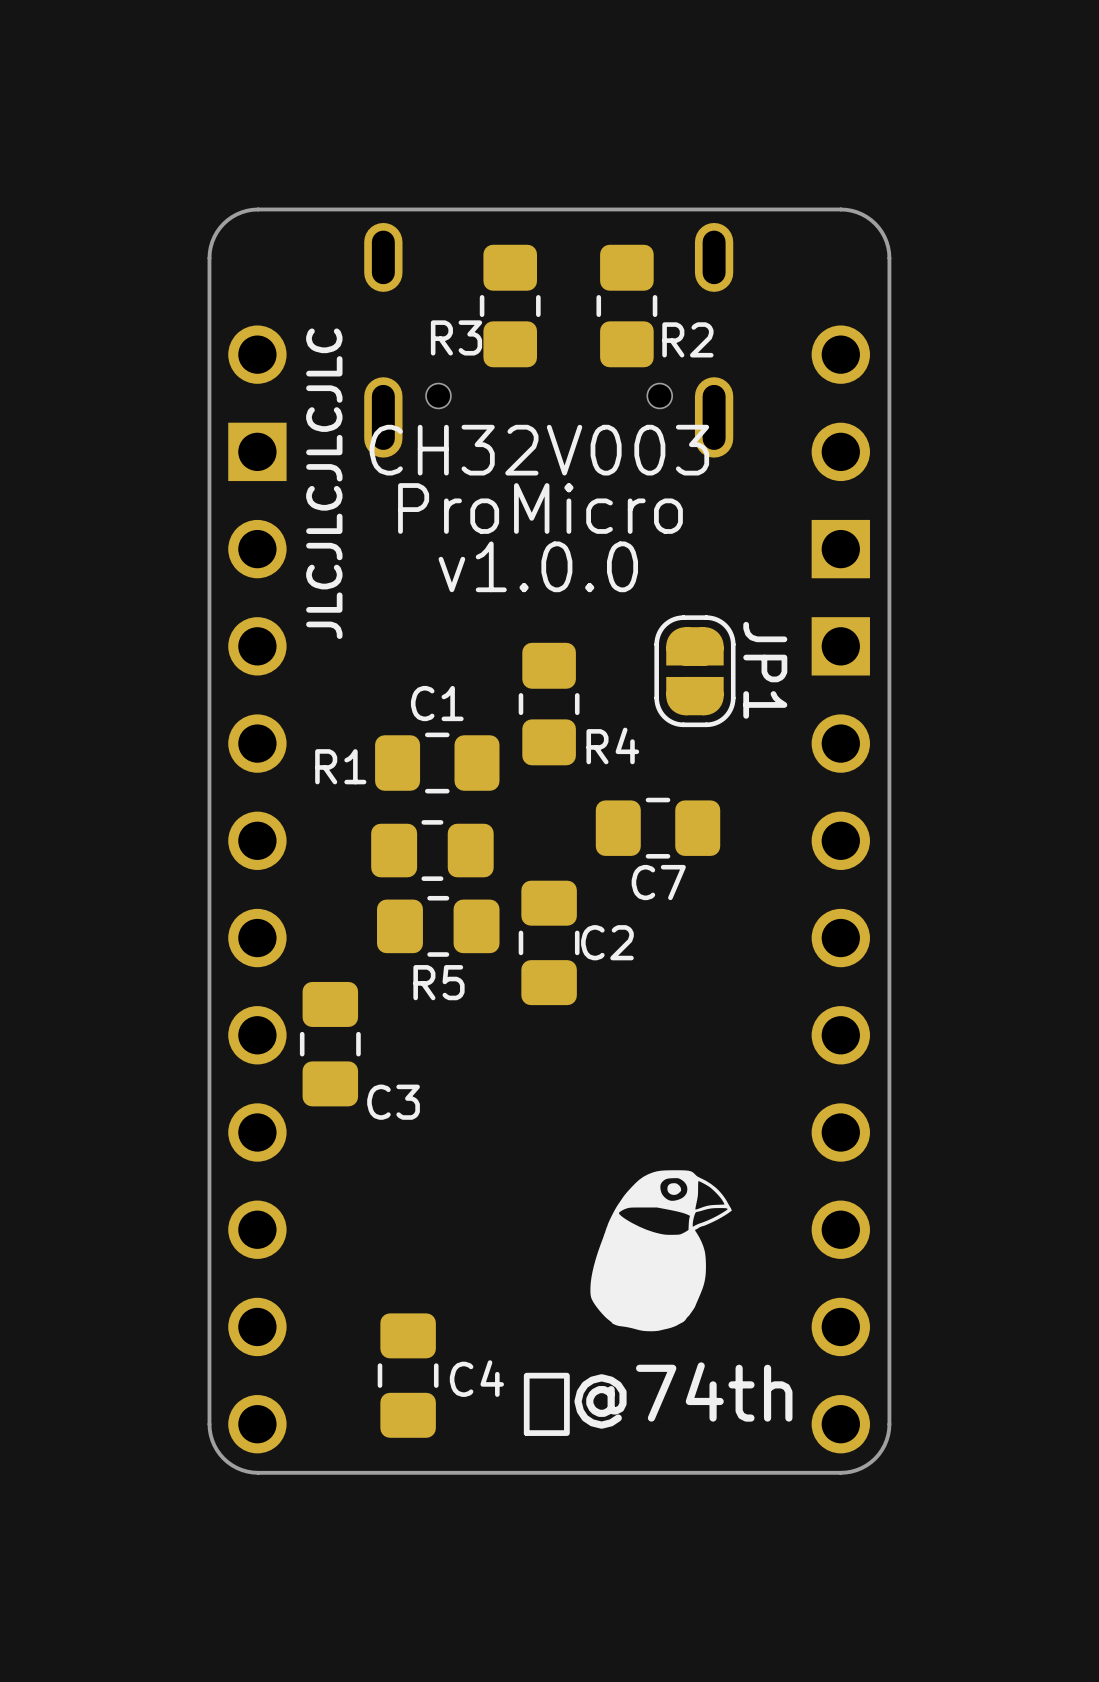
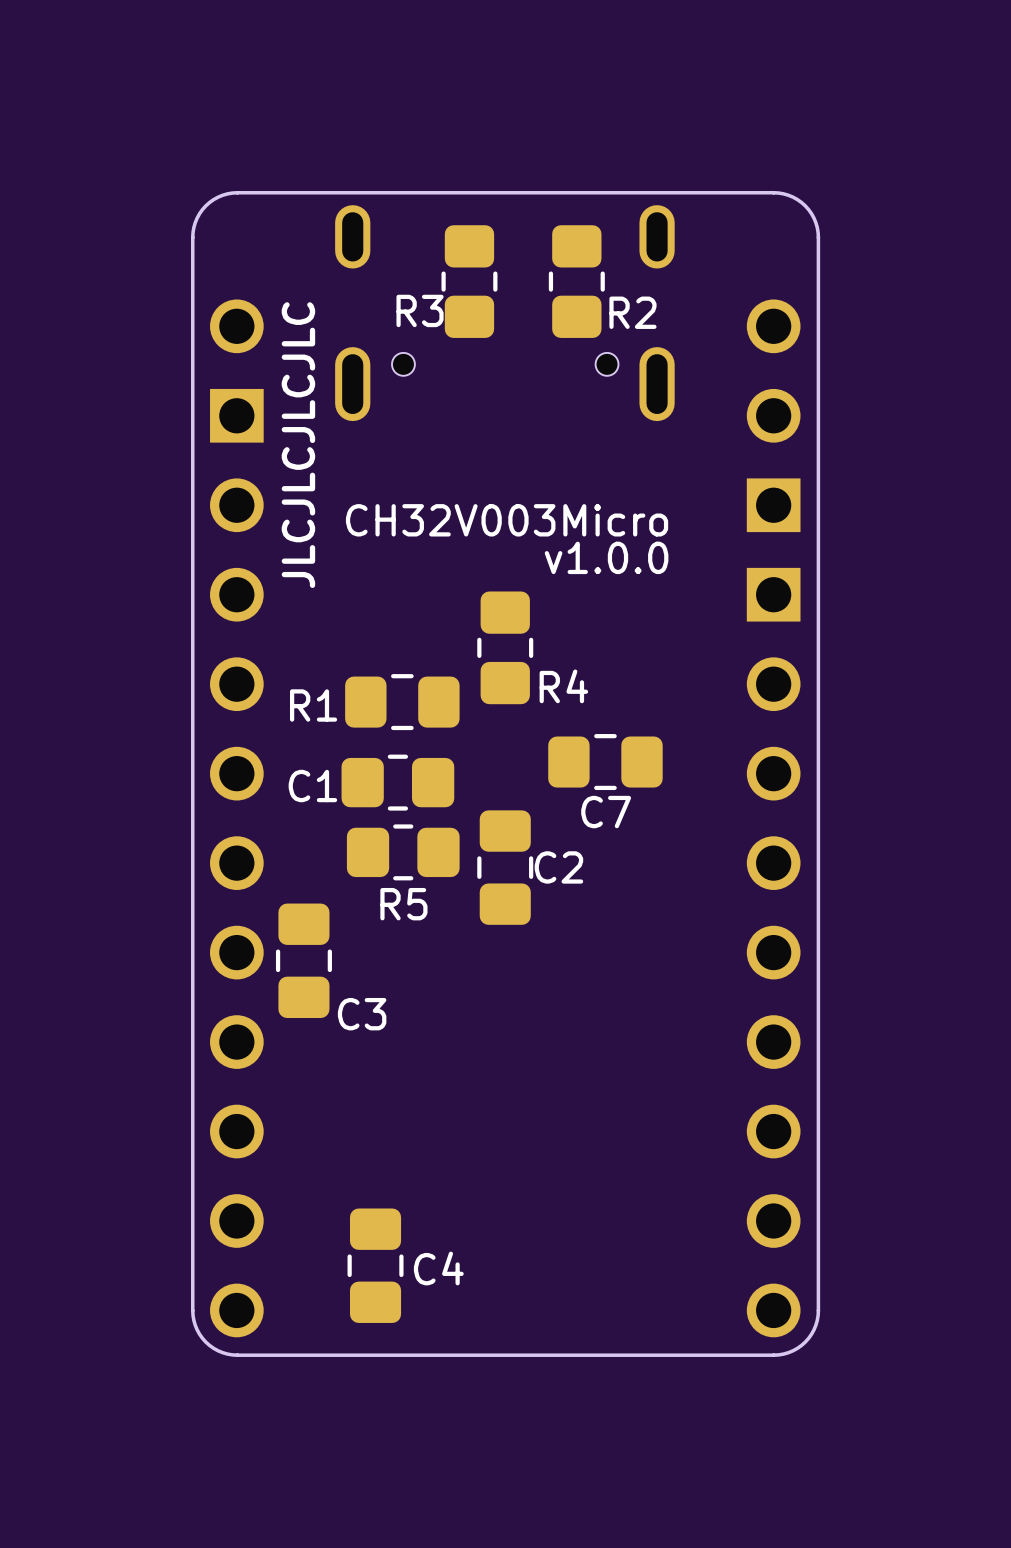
text: CH32V003 (539, 450) -> none
text: ProMicro (540, 508) -> none
text: v1.0.0 (538, 566) -> CH32V003Micro (507, 520)
text: none -> v1.0.0 (606, 557)
JP1: (694, 671) -> none
C1 name position: C1 (437, 703) -> C1 (312, 786)
drawing: [590, 1170, 733, 1332] -> none

